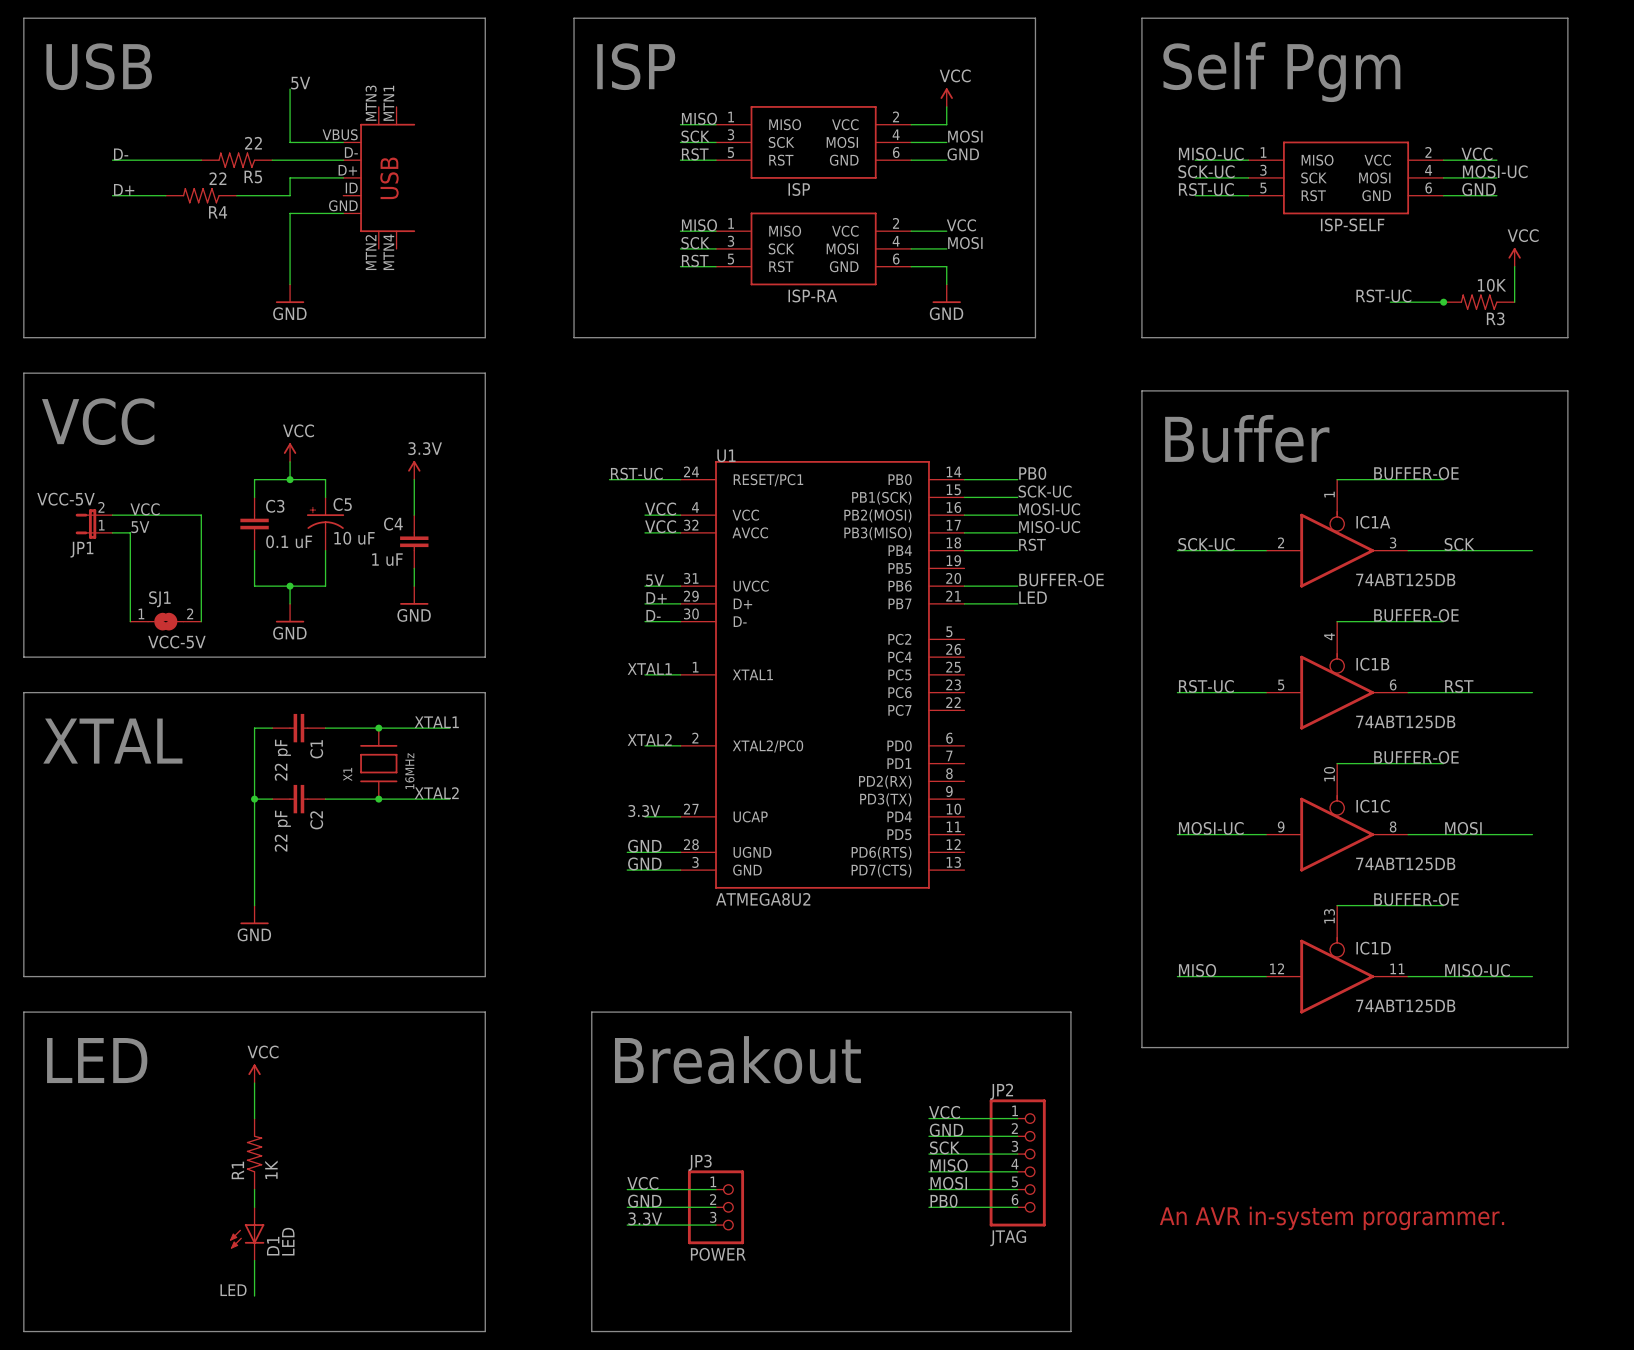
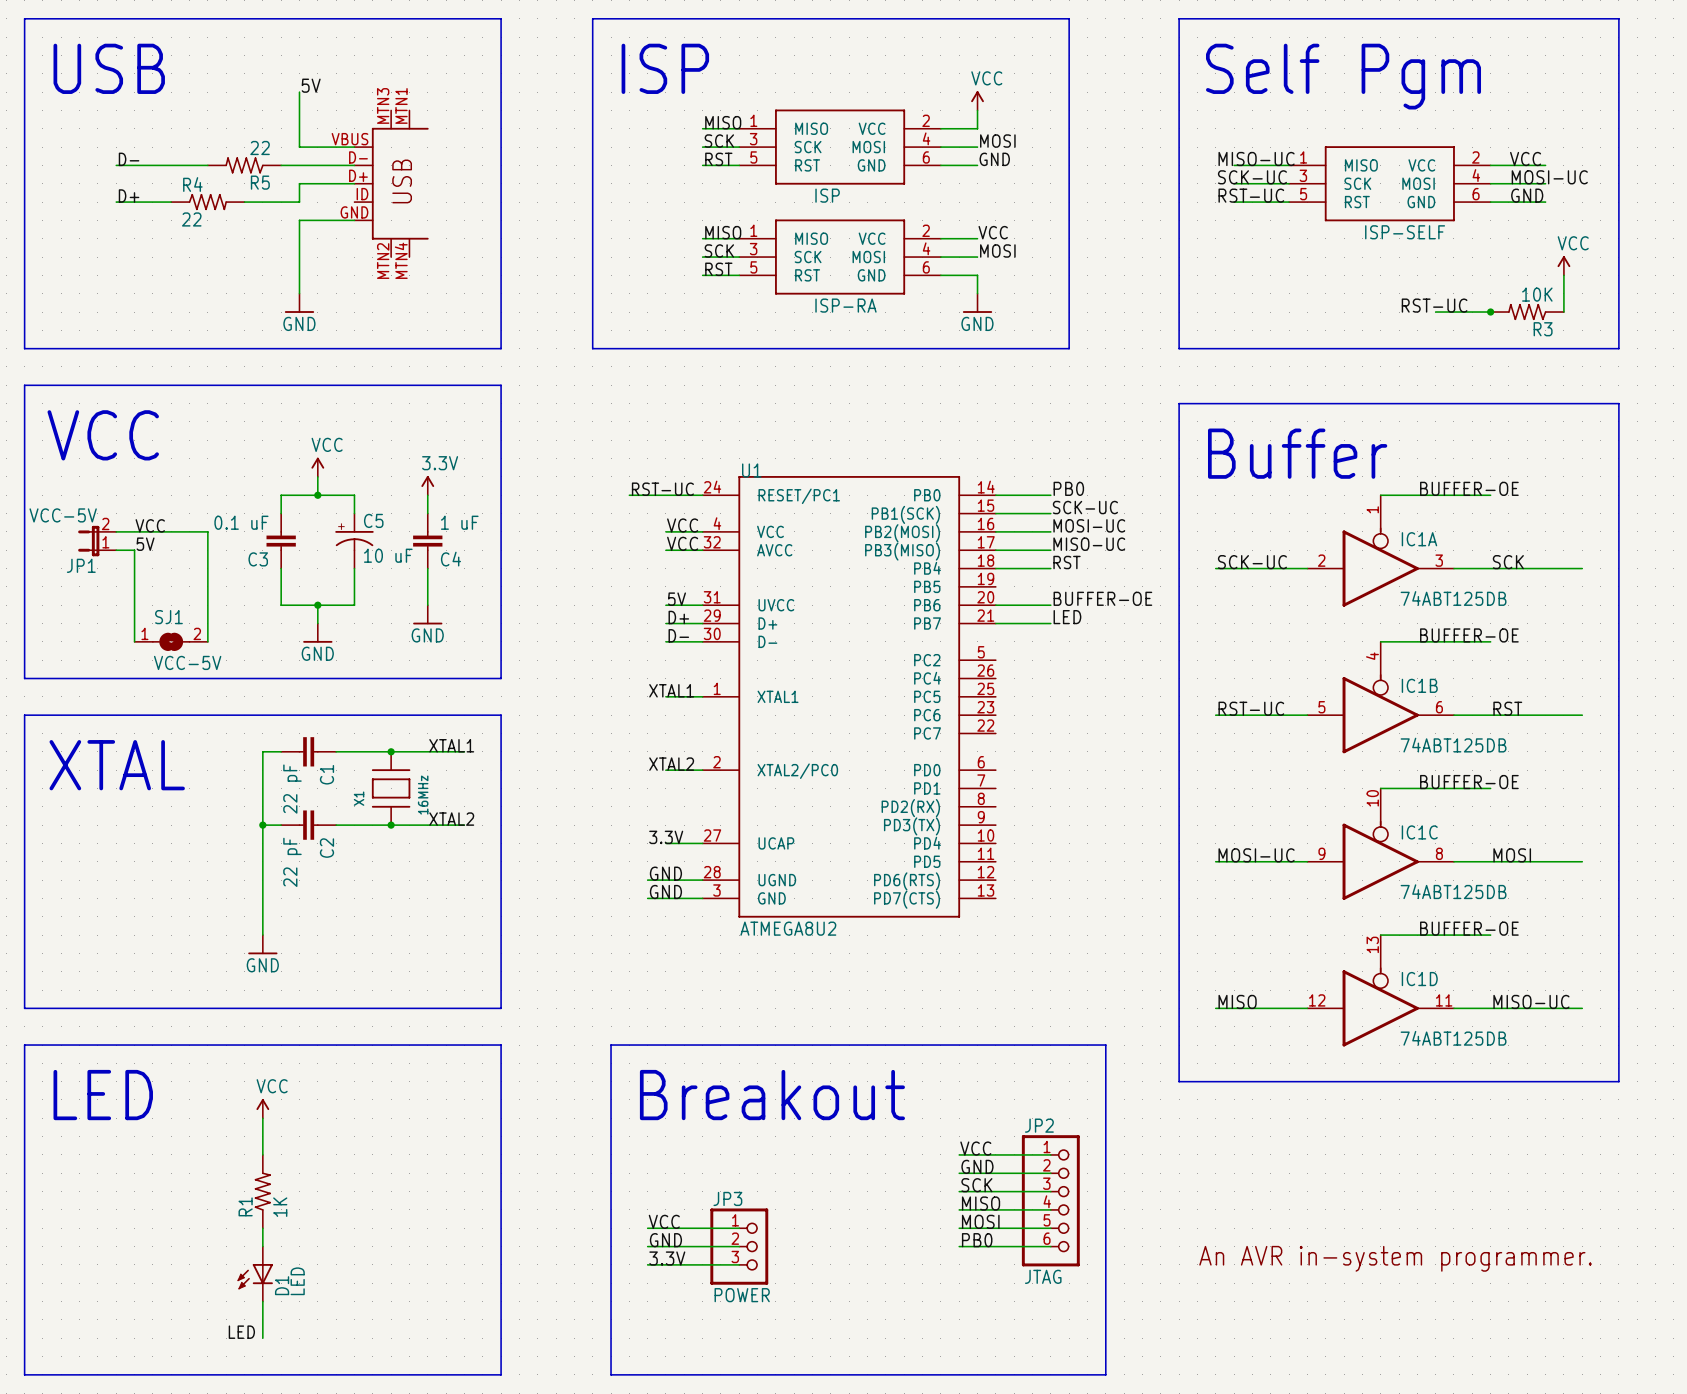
R4 rotation: 0° (201, 195) -> 180° (207, 202)
power symbol position: VCC (290, 452) -> VCC (317, 467)
wire: (290, 461) (290, 479) -> (317, 476) (317, 495)
wire: (272, 479) (254, 479) (254, 497) -> (281, 495) (281, 513)
junction position: (290, 479) -> (317, 495)
wire: (325, 479) (325, 497) -> (336, 495) (354, 495) (354, 513)
C3 name position: C3 (275, 506) -> C3 (258, 559)
C3 position: (254, 524) -> (281, 541)
C5 position: (325, 524) -> (354, 541)
C4 name position: C4 (393, 524) -> C4 (450, 559)
C3 value position: 0.1 uF (289, 541) -> 0.1 uF (241, 522)
C4 position: (414, 541) -> (427, 541)
wire: (254, 550) (254, 586) (272, 586) -> (281, 568) (281, 605)
wire: (325, 550) (325, 586) -> (354, 568) (354, 605) (336, 605)
C4 value position: 1 uF (387, 559) -> 1 uF (459, 522)
wire: (290, 586) (290, 603) -> (317, 605) (317, 623)
junction position: (290, 586) -> (317, 605)
power symbol position: GND (290, 613) -> GND (317, 633)

